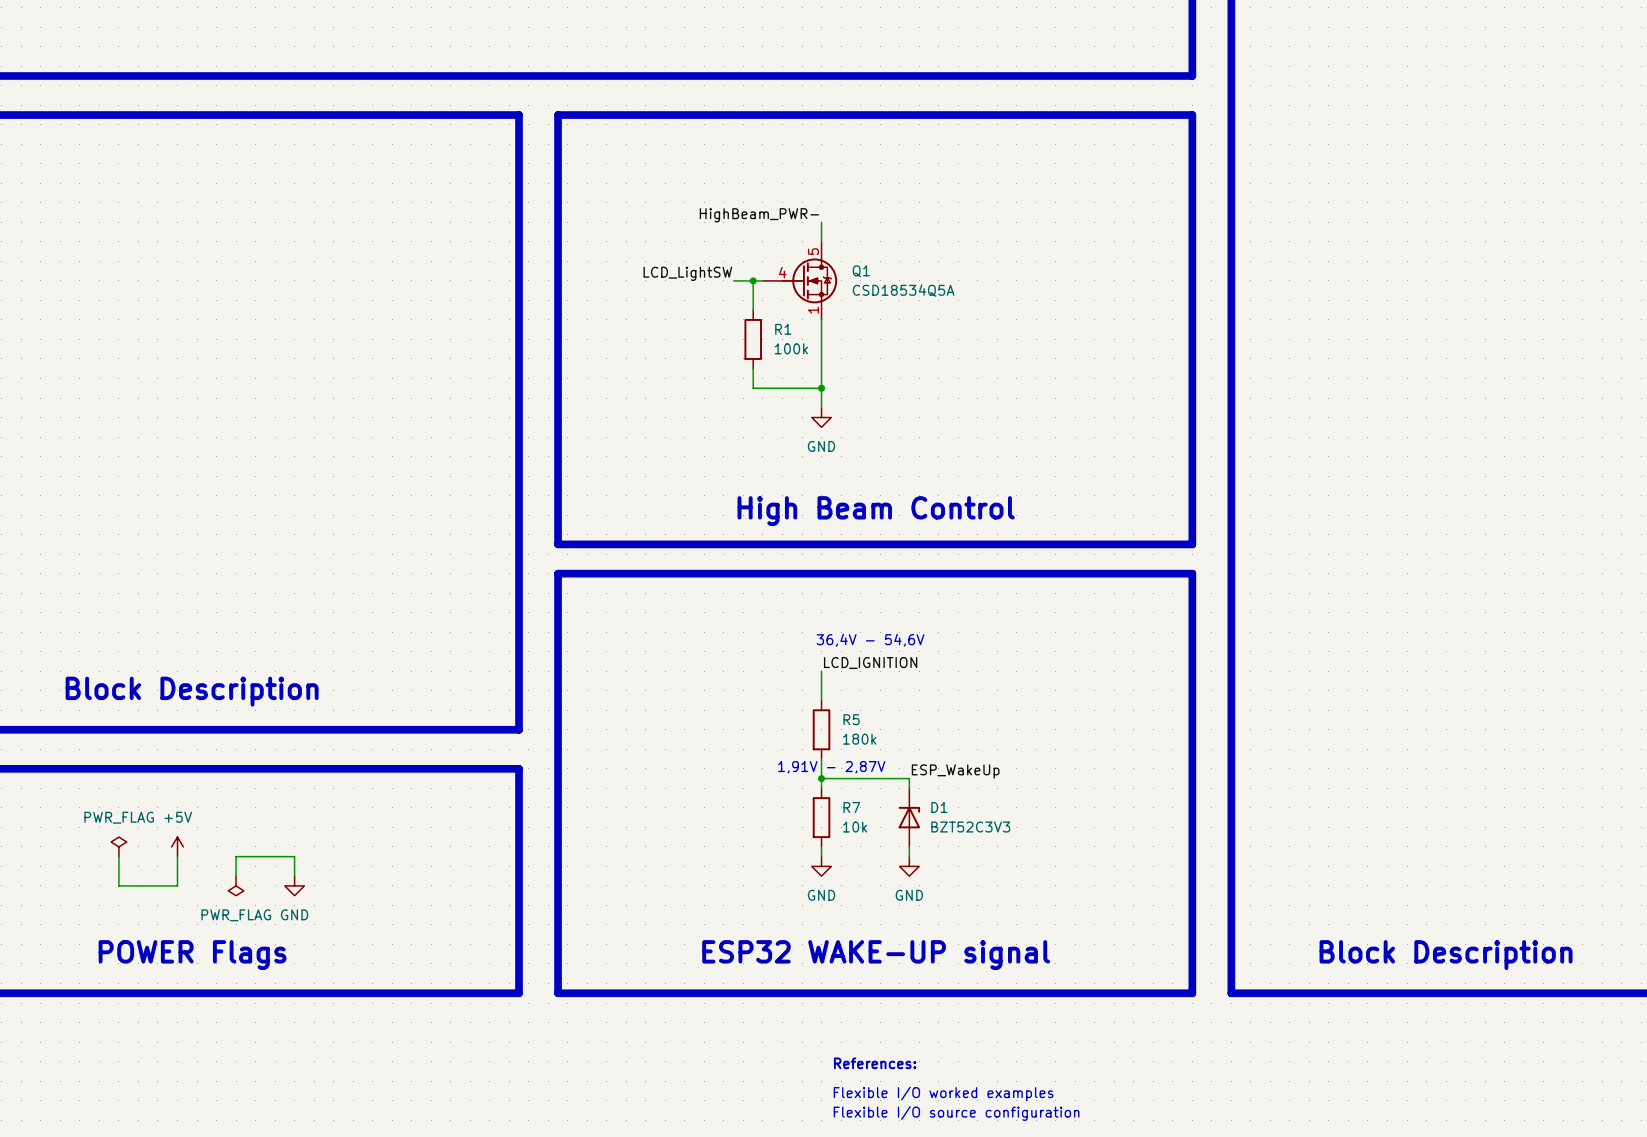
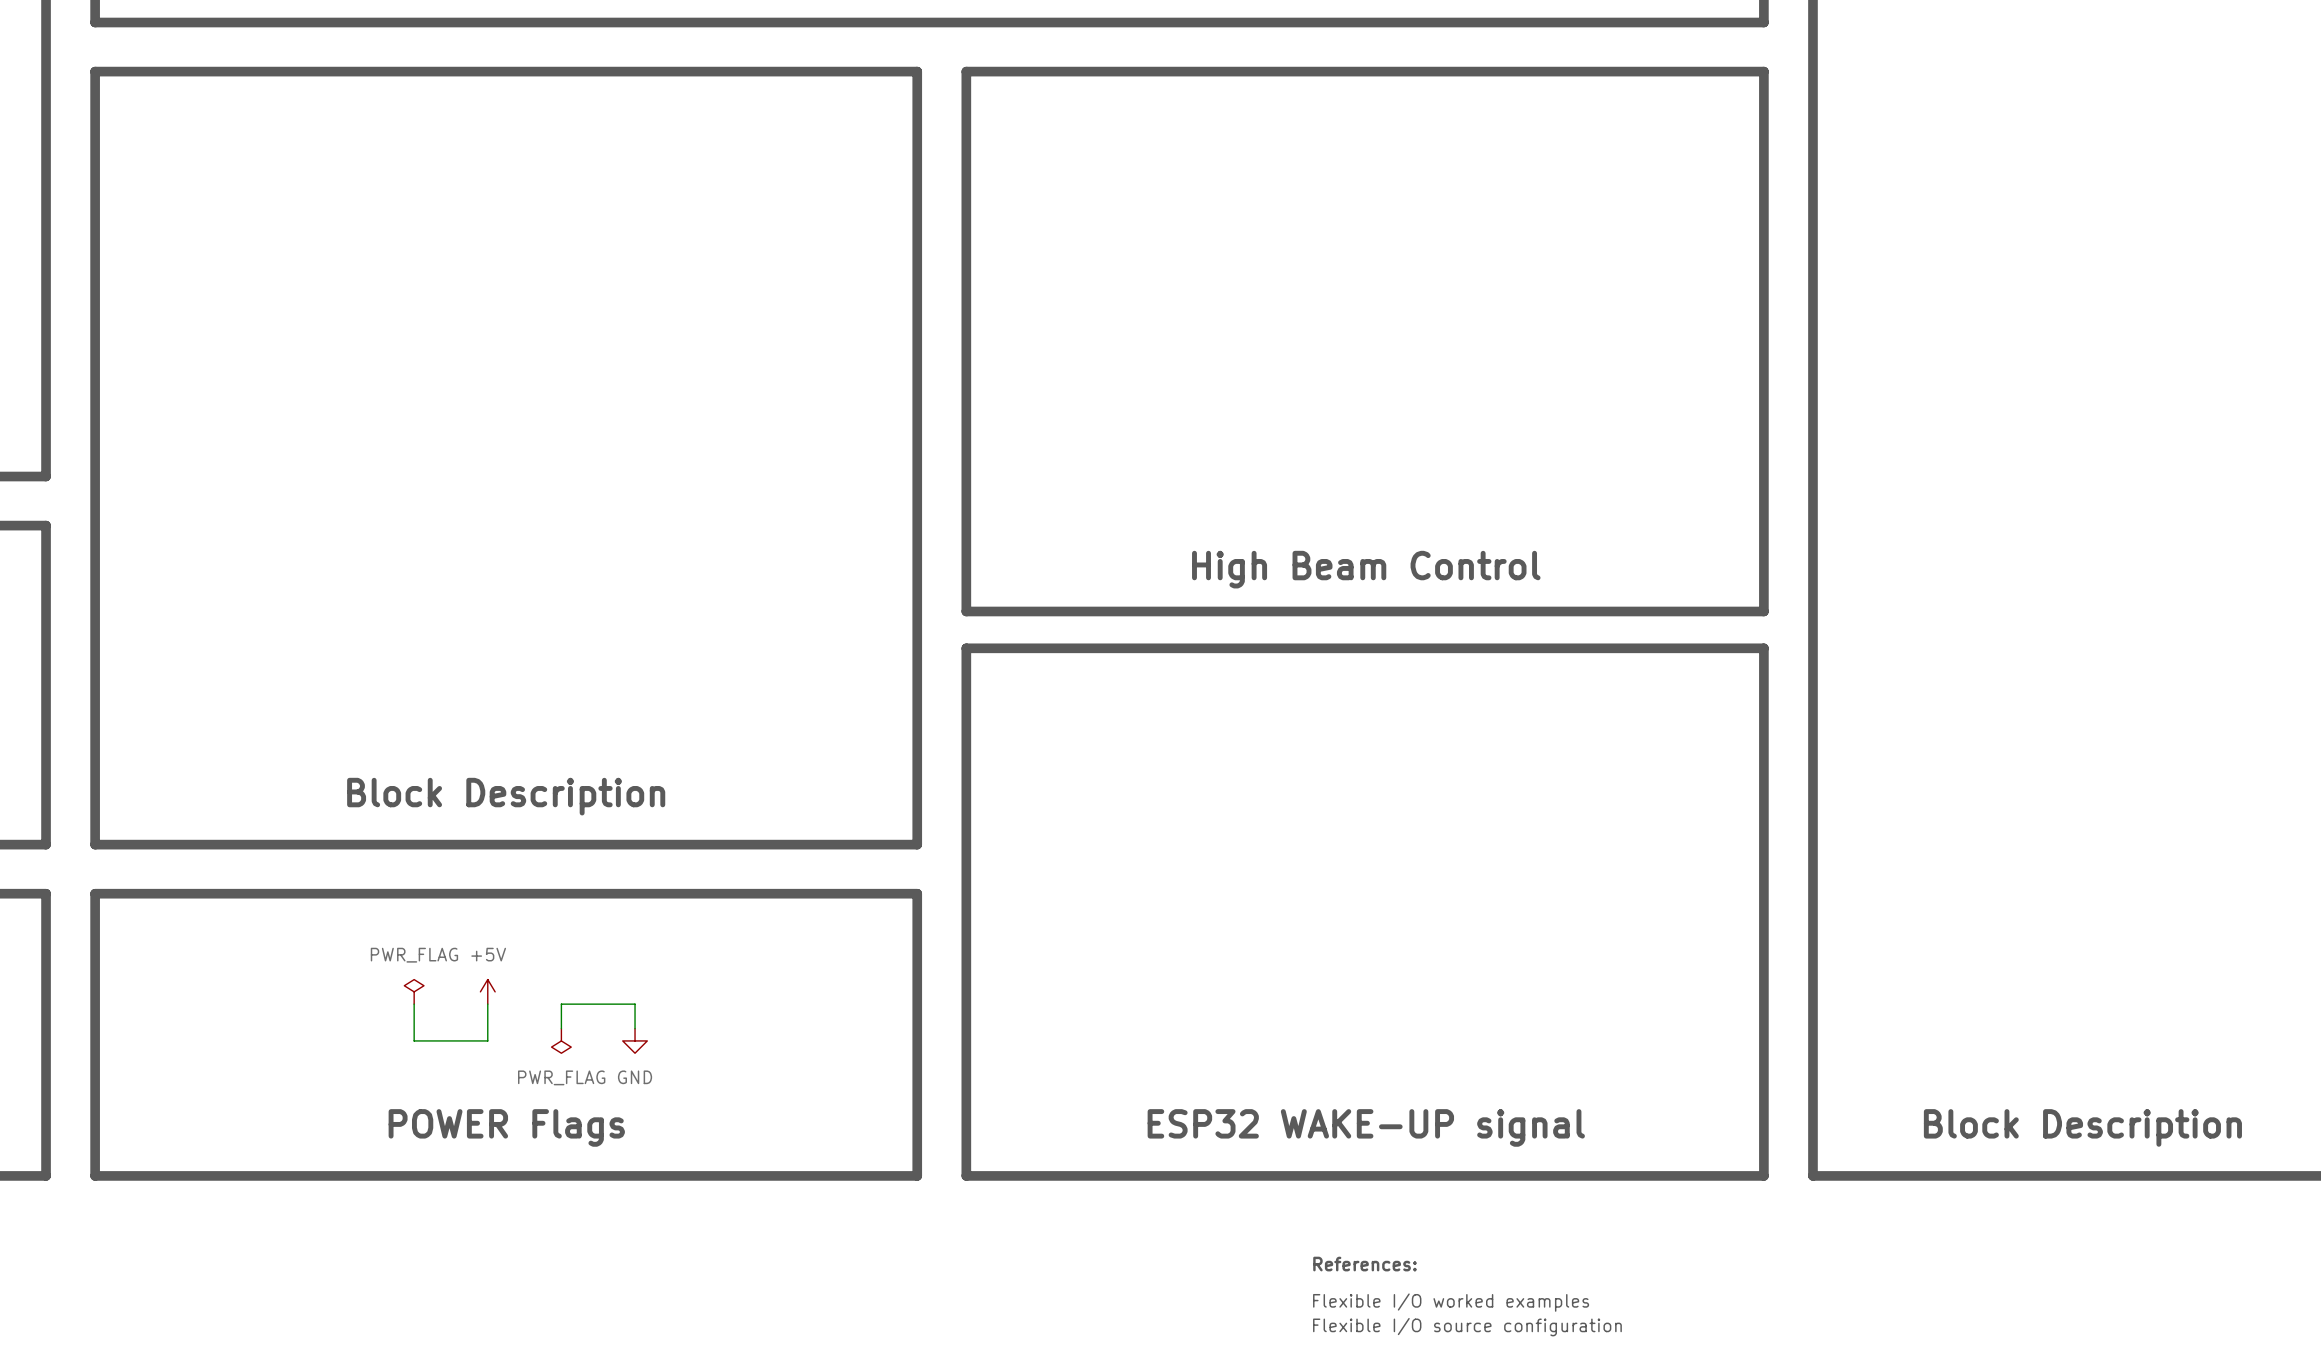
label: HighBeam_PWR- (759, 215) -> none
wire: (821, 222) (821, 241) -> none
label: LCD_LightSW (687, 273) -> none
wire: (733, 280) (762, 280) -> none
wire: (753, 280) (753, 310) -> none
junction: (753, 280) -> none
Q1: CSD18534Q5A (800, 280) -> none
wire: (821, 319) (821, 407) -> none
R1: 100k (753, 339) -> none
wire: (753, 368) (753, 388) (821, 388) -> none
junction: (821, 388) -> none
power symbol: GND (821, 417) -> none
text: 36,4V - 54,6V (870, 640) -> none
label: LCD_IGNITION (870, 663) -> none
wire: (821, 671) (821, 700) -> none
R5: 180k (821, 729) -> none
wire: (821, 759) (821, 788) -> none
text: 1,91V - 2,87V (831, 767) -> none
label: ESP_WakeUp (955, 771) -> none
wire: (821, 778) (909, 778) (909, 788) -> none
junction: (821, 778) -> none
R7: 10k (821, 817) -> none
D1: BZT52C3V3 (909, 817) -> none
wire: (821, 846) (821, 856) -> none
wire: (909, 846) (909, 856) -> none
power symbol: GND (821, 866) -> none
power symbol: GND (909, 866) -> none

